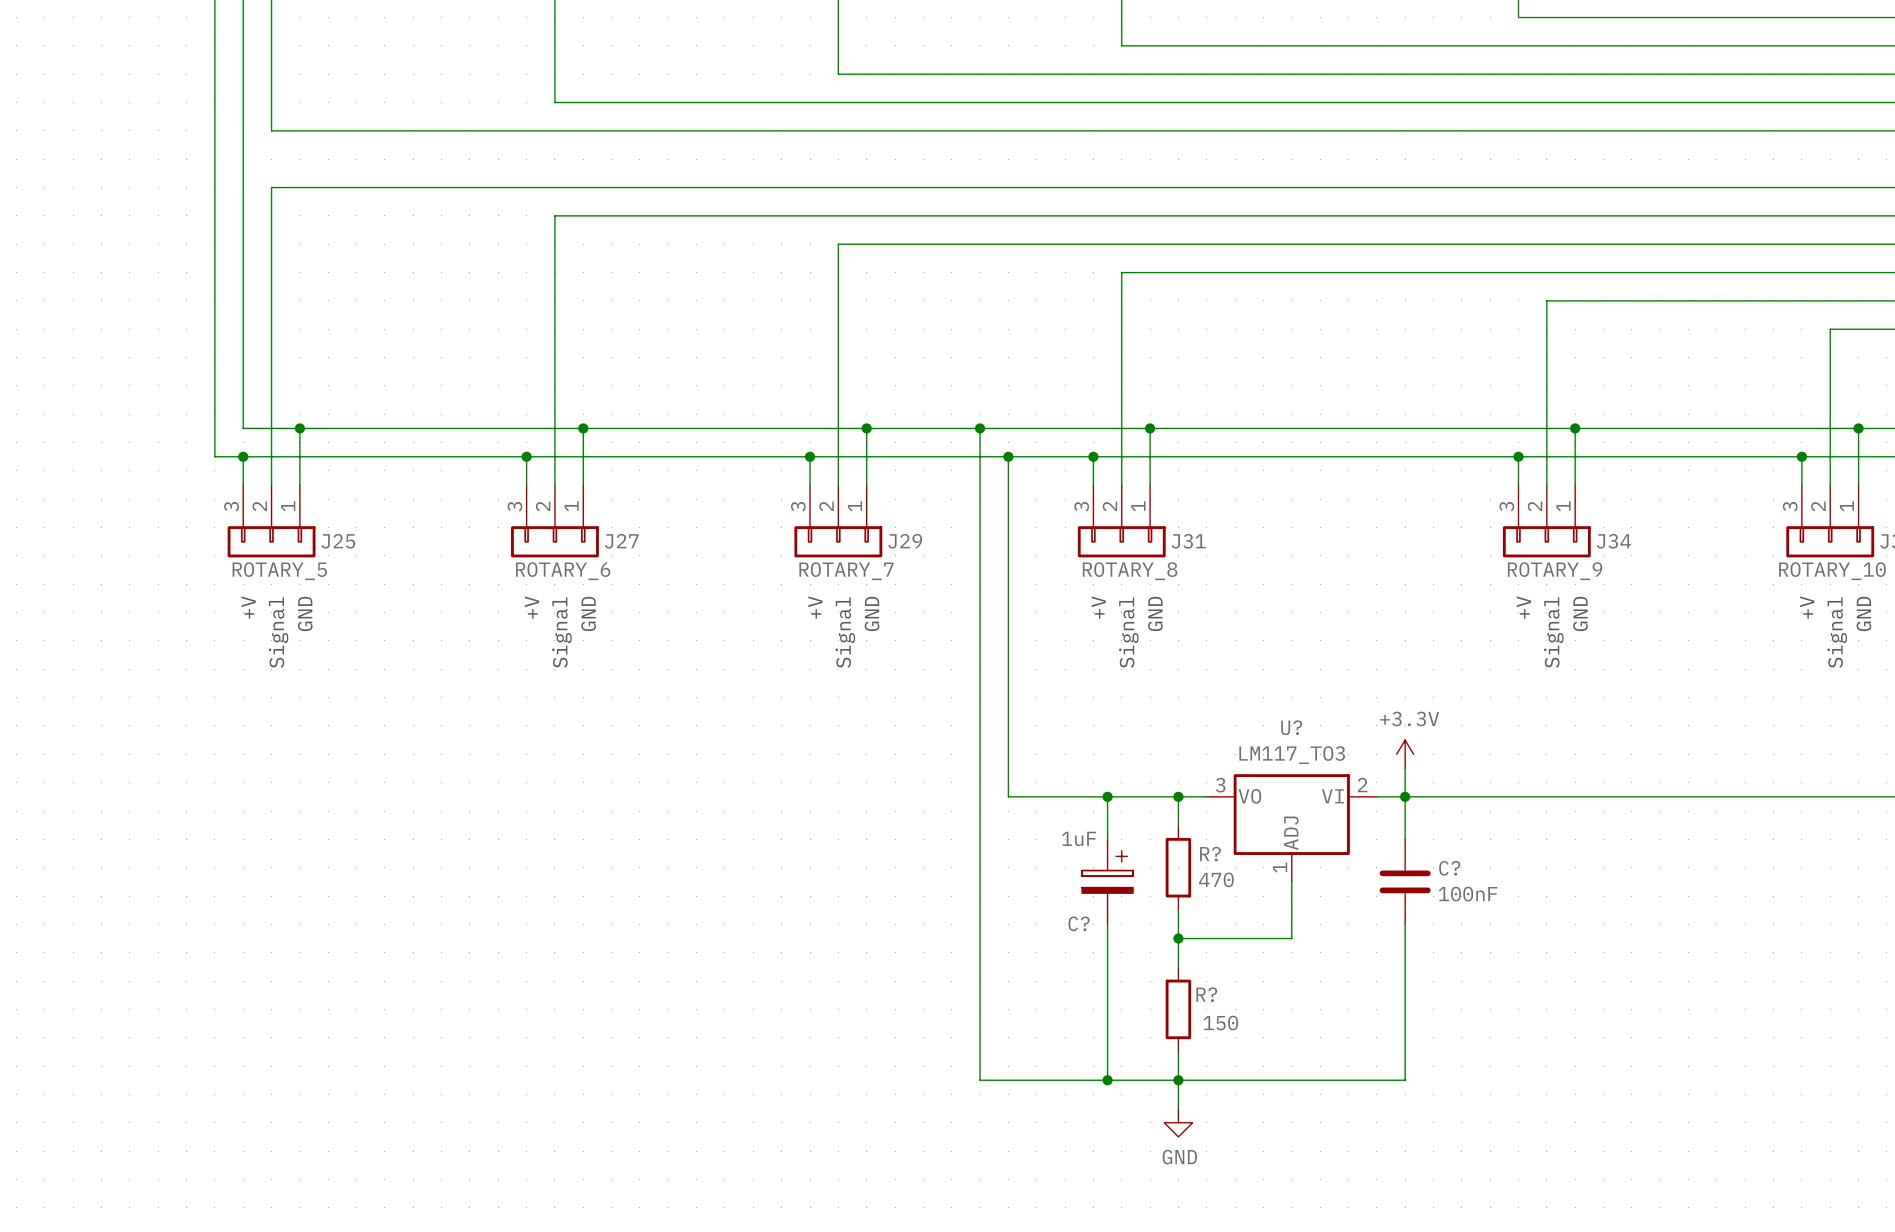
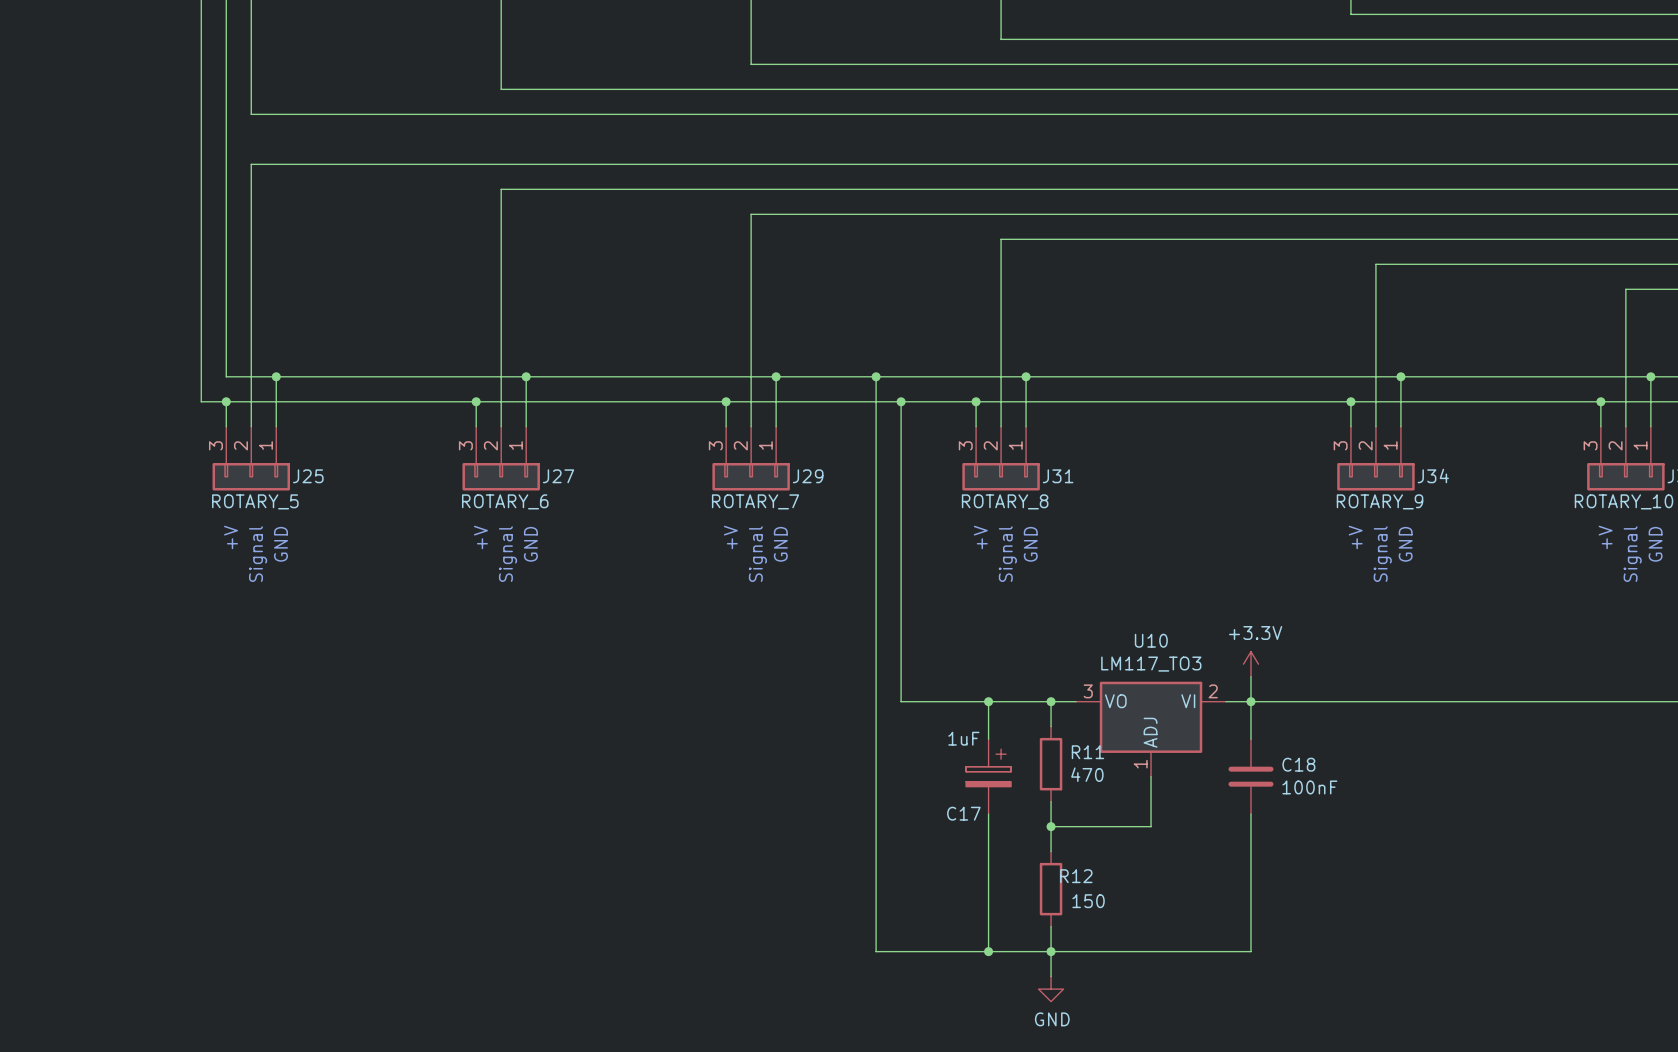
U? name: U? (1291, 727) -> U10 (1151, 640)
R? name: R? (1210, 854) -> R11 (1087, 752)
C? name: C? (1449, 868) -> C18 (1298, 764)
C? name: C? (1079, 923) -> C17 (963, 813)
R? name: R? (1206, 994) -> R12 (1076, 876)

